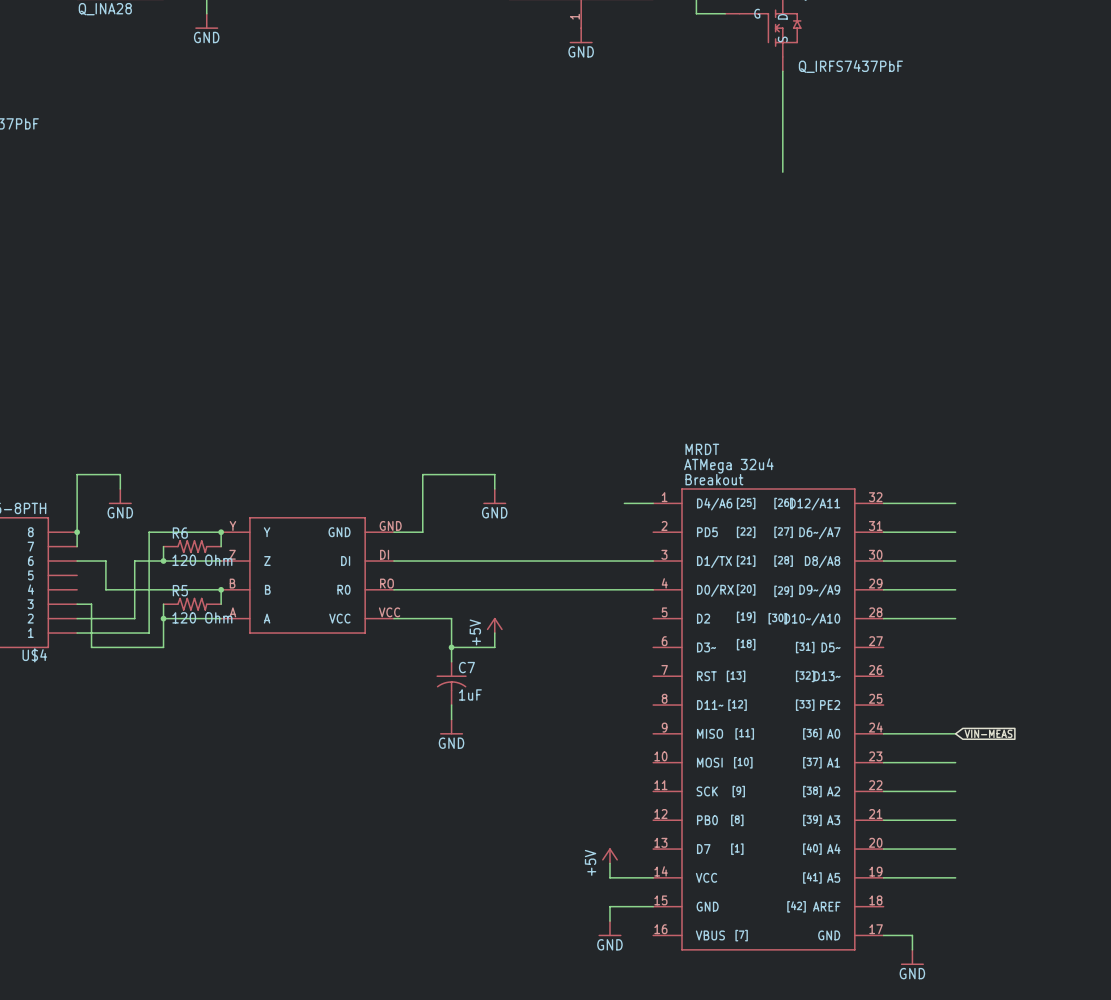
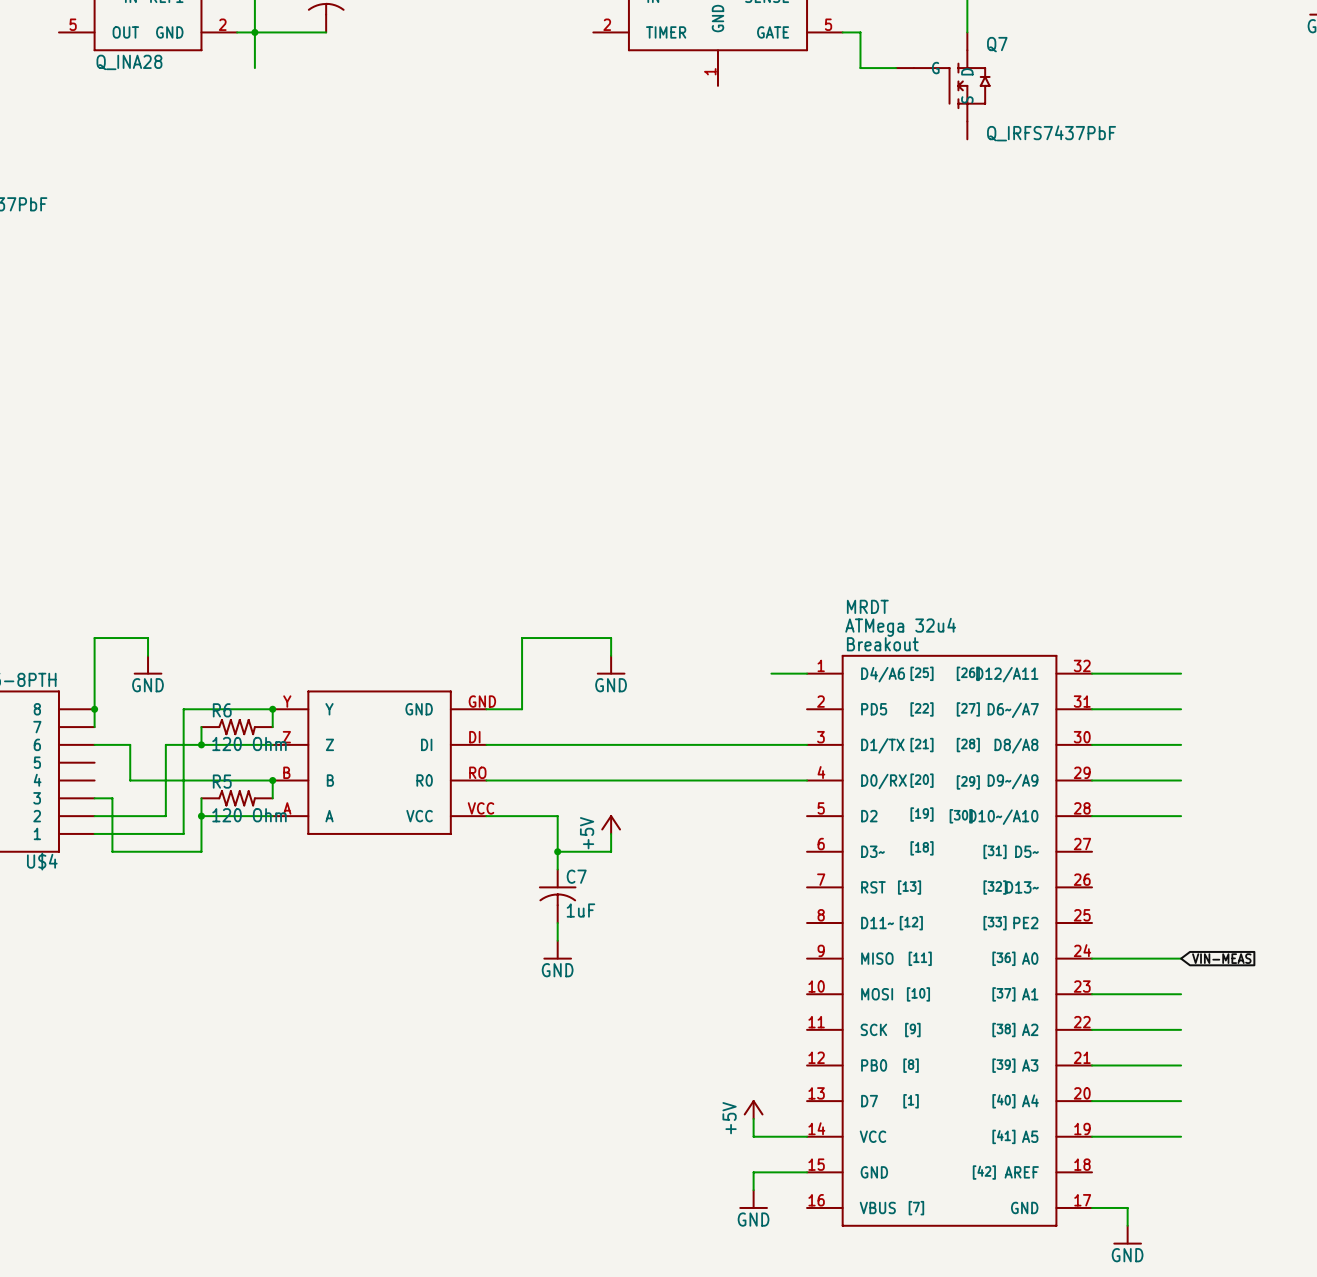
power symbol: GND (206, 21) -> none
power symbol: GND (581, 35) -> none
wire: (782, 71) (782, 172) -> none

